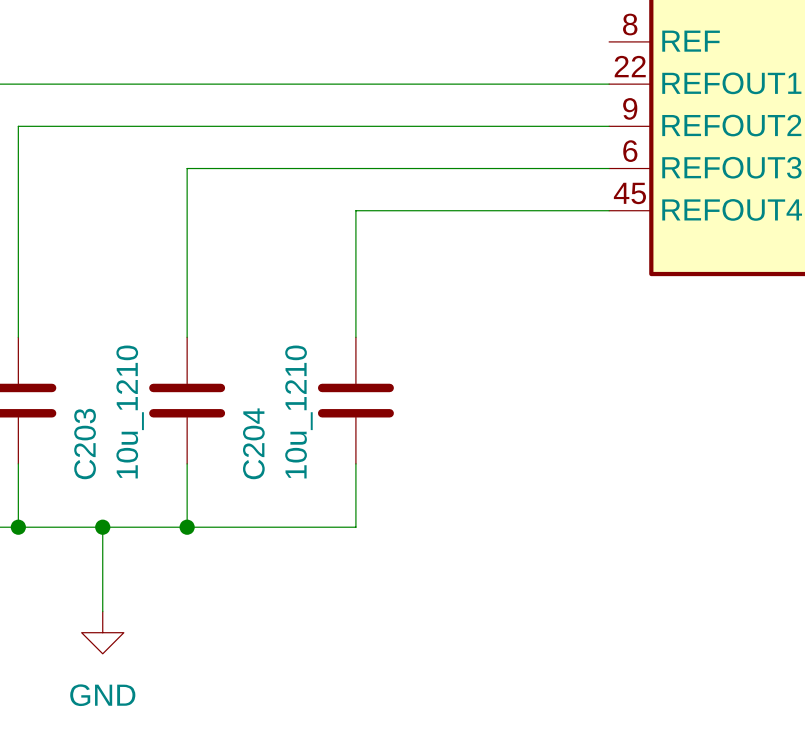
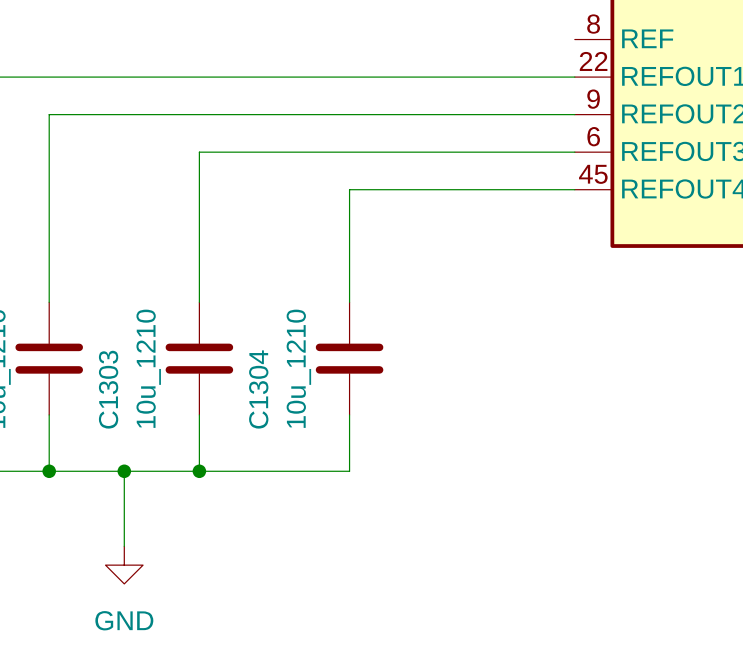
C204 name: C204 (253, 443) -> C1304 (258, 389)
C203 name: C203 (85, 444) -> C1303 (108, 389)

